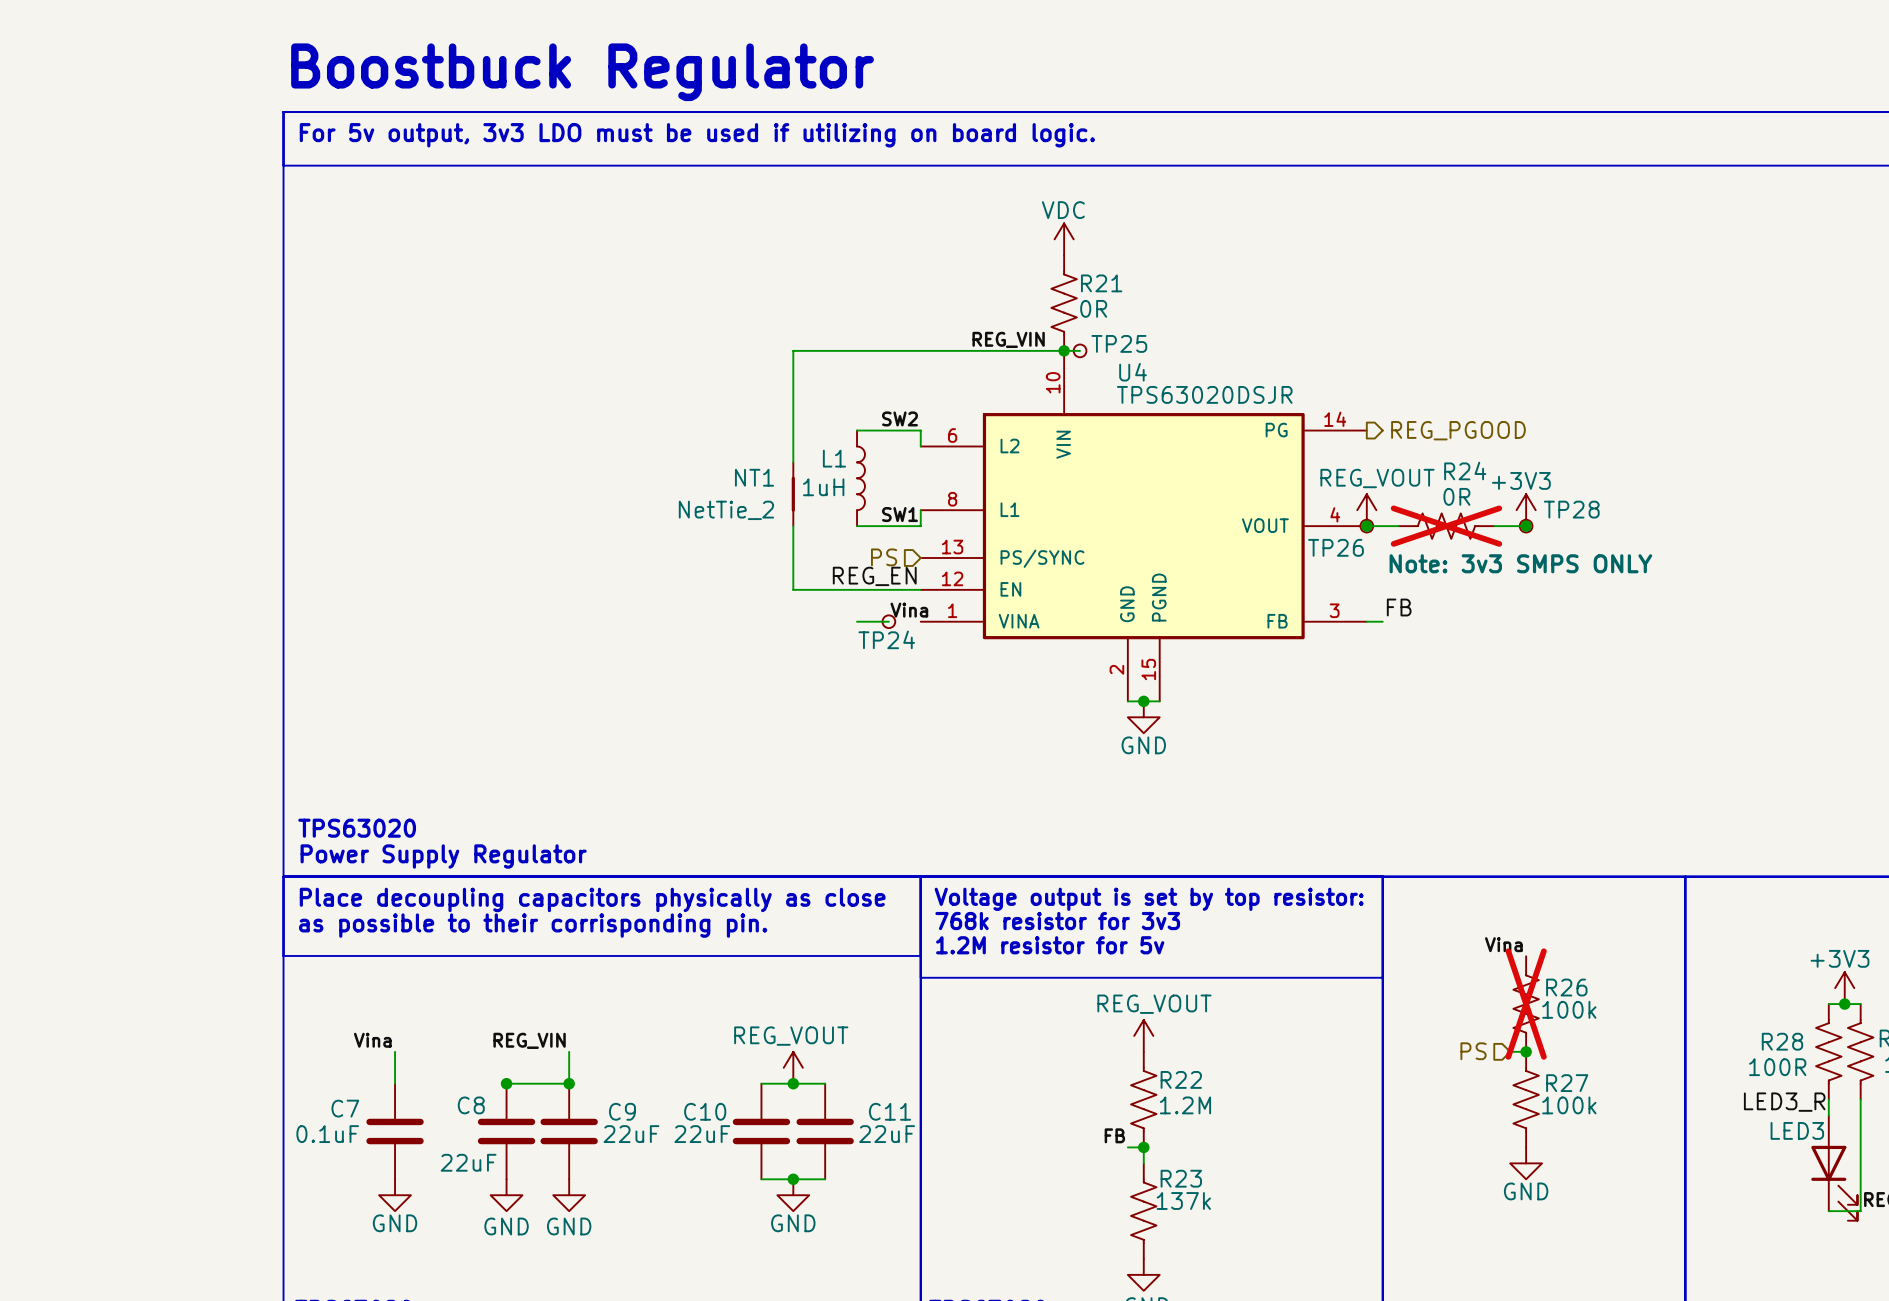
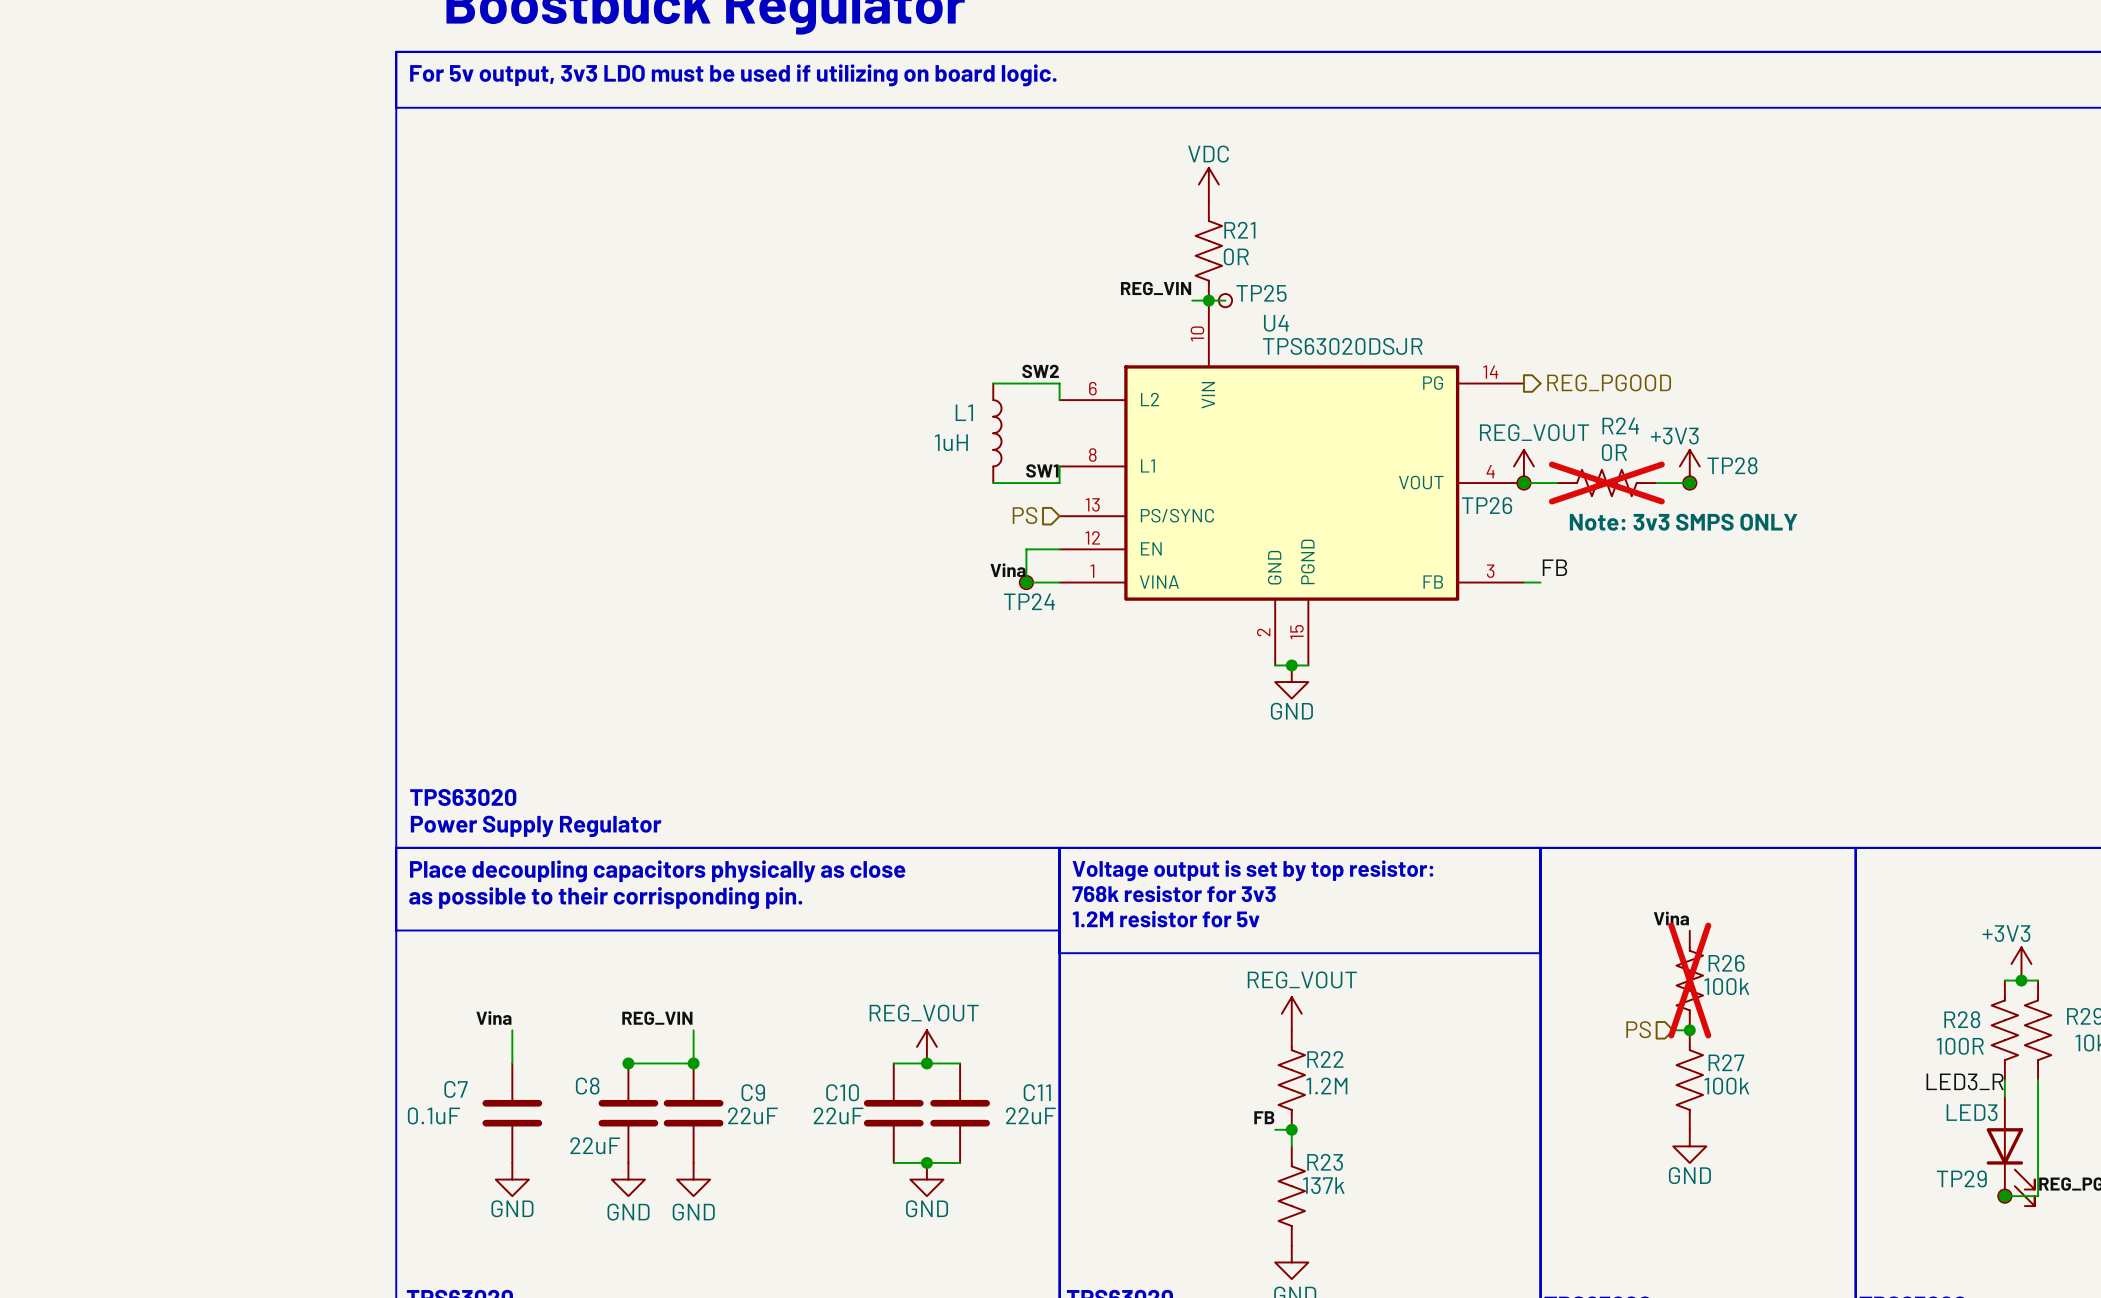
wire: (1048, 350) (793, 350) (793, 462) -> none
NT1: NetTie_2 (793, 494) -> none
wire: (793, 526) (793, 589) (888, 589) -> (1059, 582) (1026, 582) (1026, 549)
label: REG_EN (874, 576) -> none
label position: Vina (909, 610) -> Vina (1008, 570)
wire: (857, 621) (888, 621) -> none
junction: none -> (1026, 582)
TP29: none -> (2004, 1196)
junction: none -> (2004, 1196)

